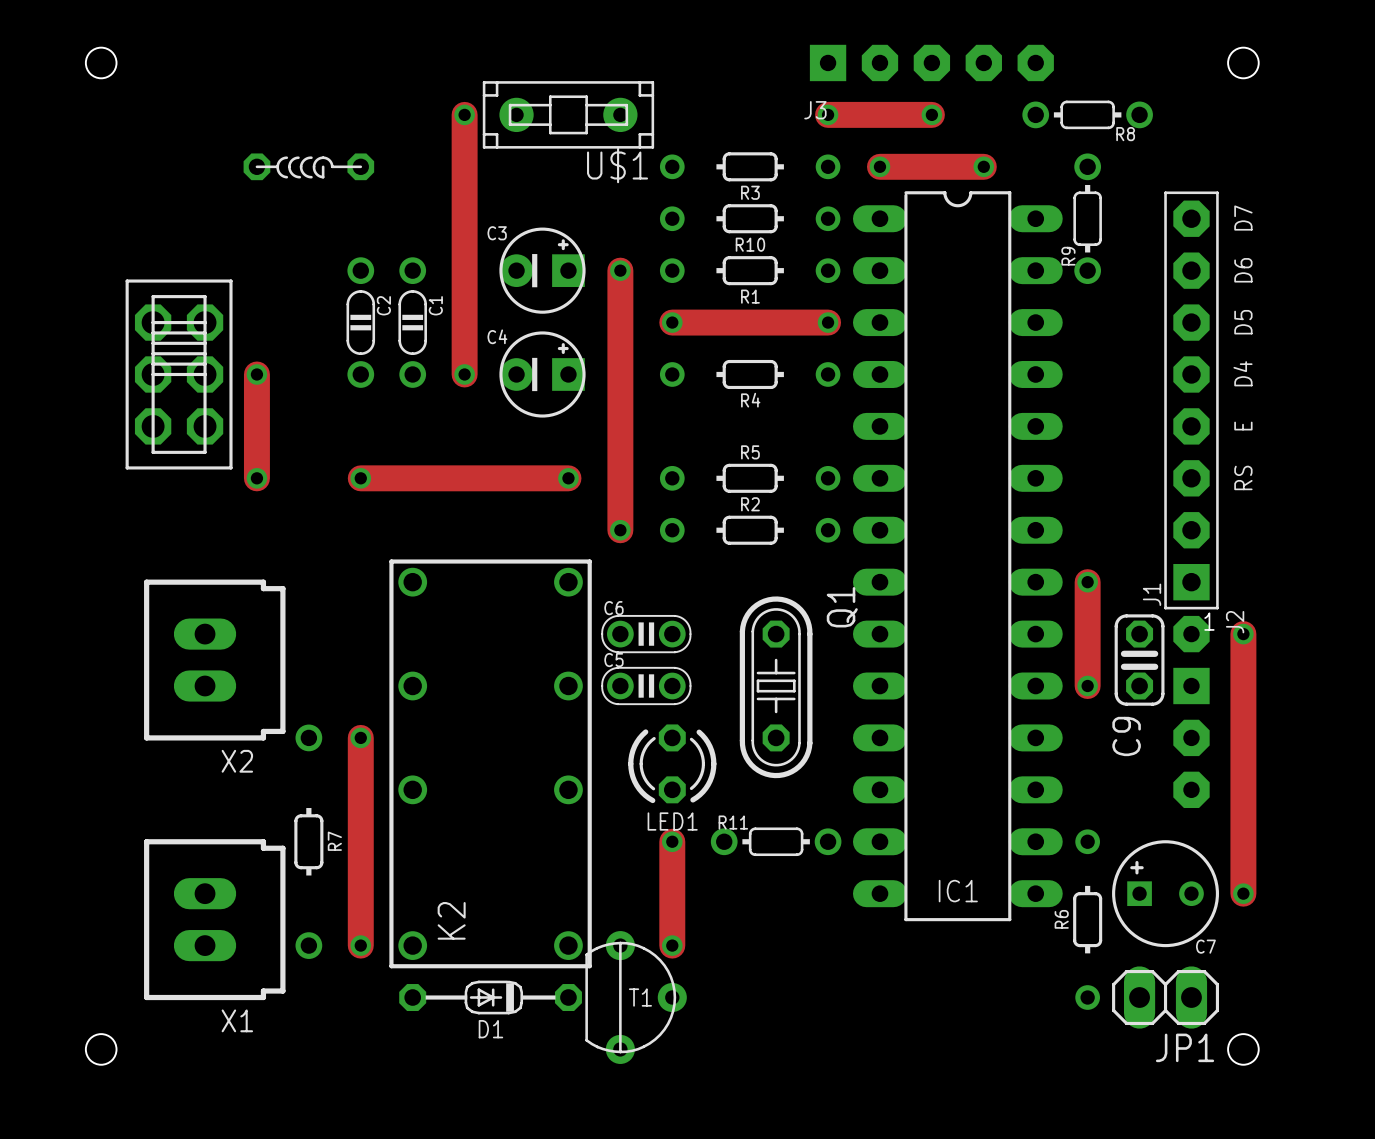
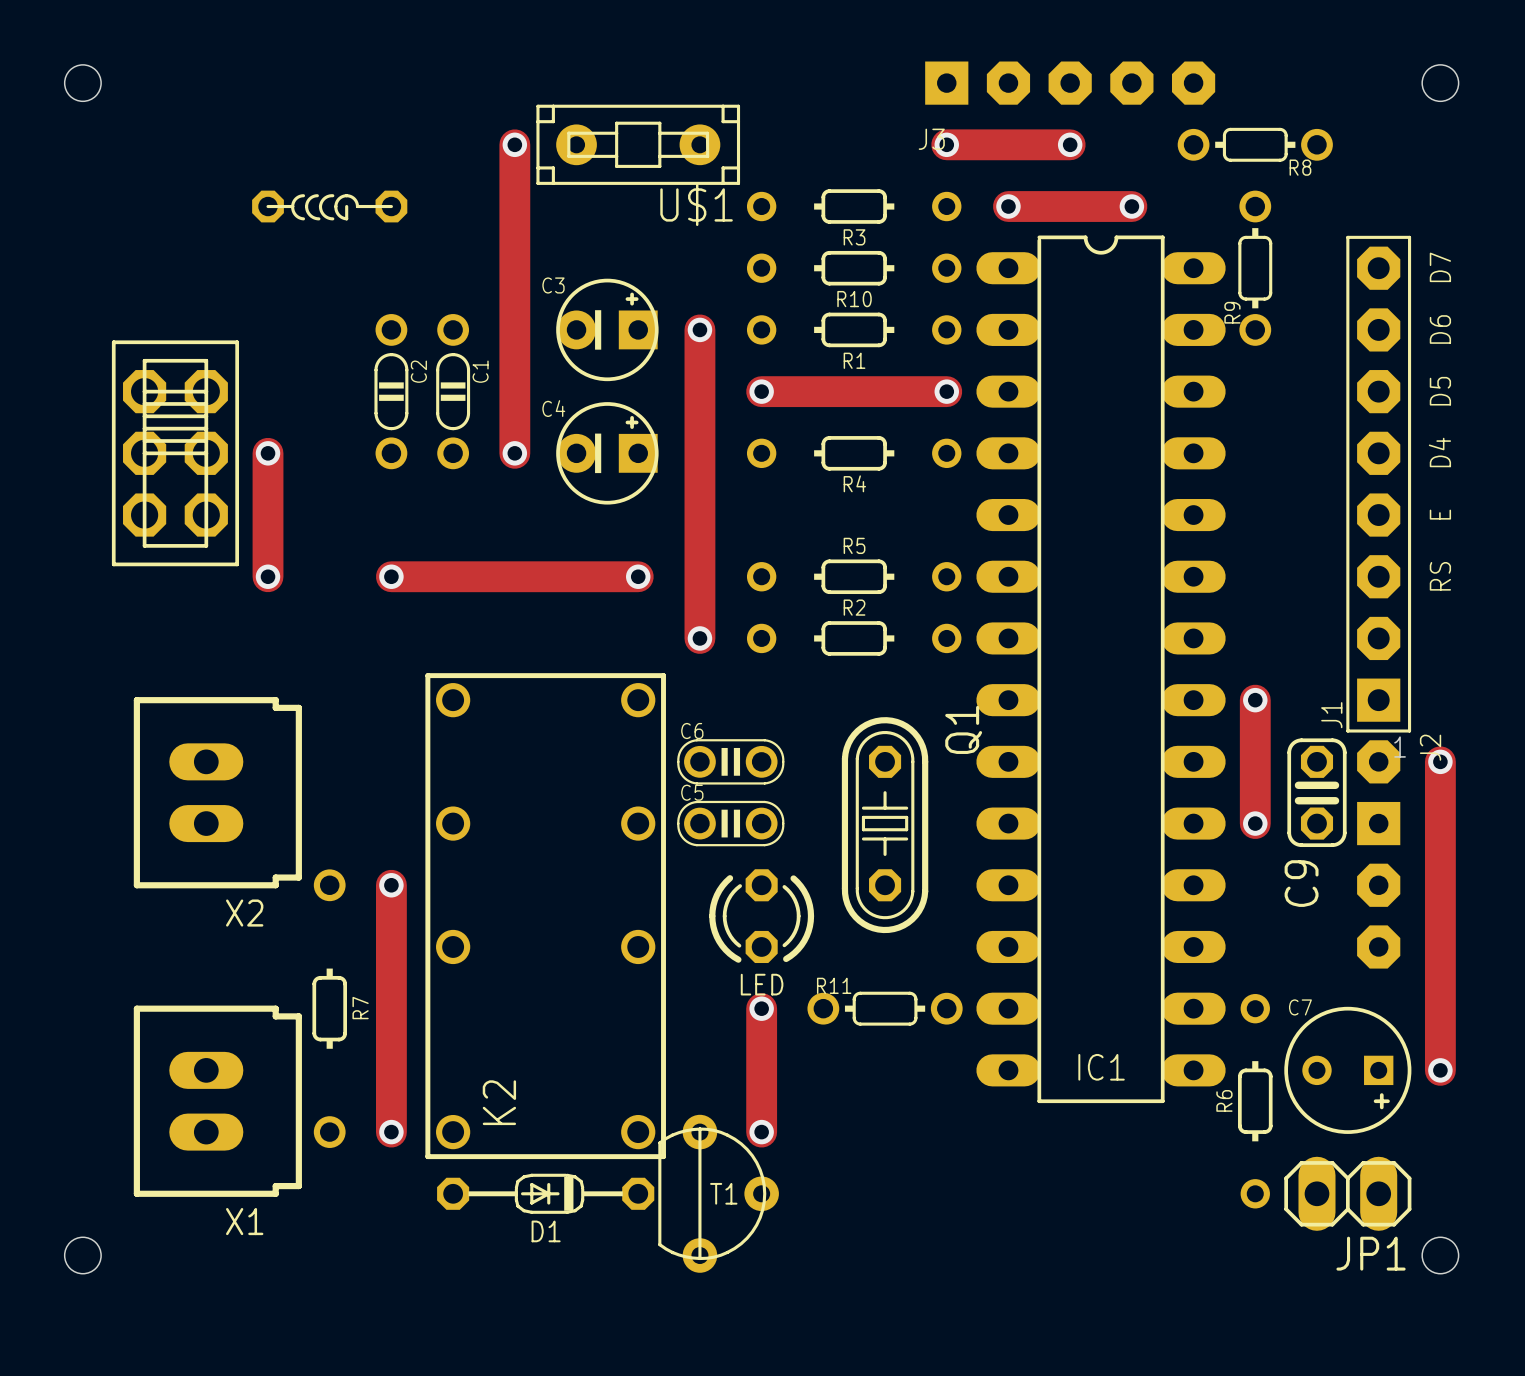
LED1 name: LED1 (672, 821) -> LED (762, 984)
C7 rotation: 0° (1165, 893) -> 180° (1347, 1070)

